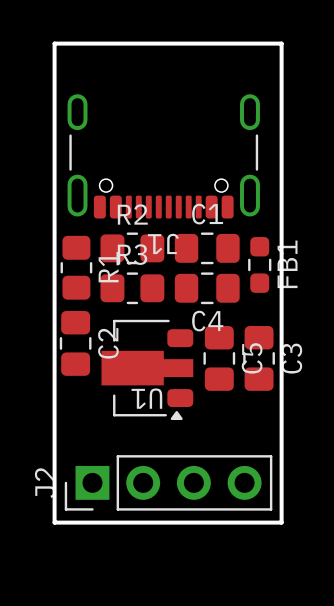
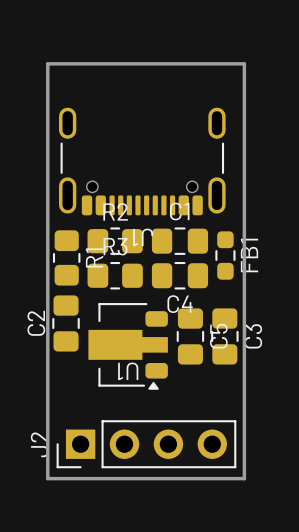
C2 name position: C2 (108, 343) -> C2 (36, 323)

